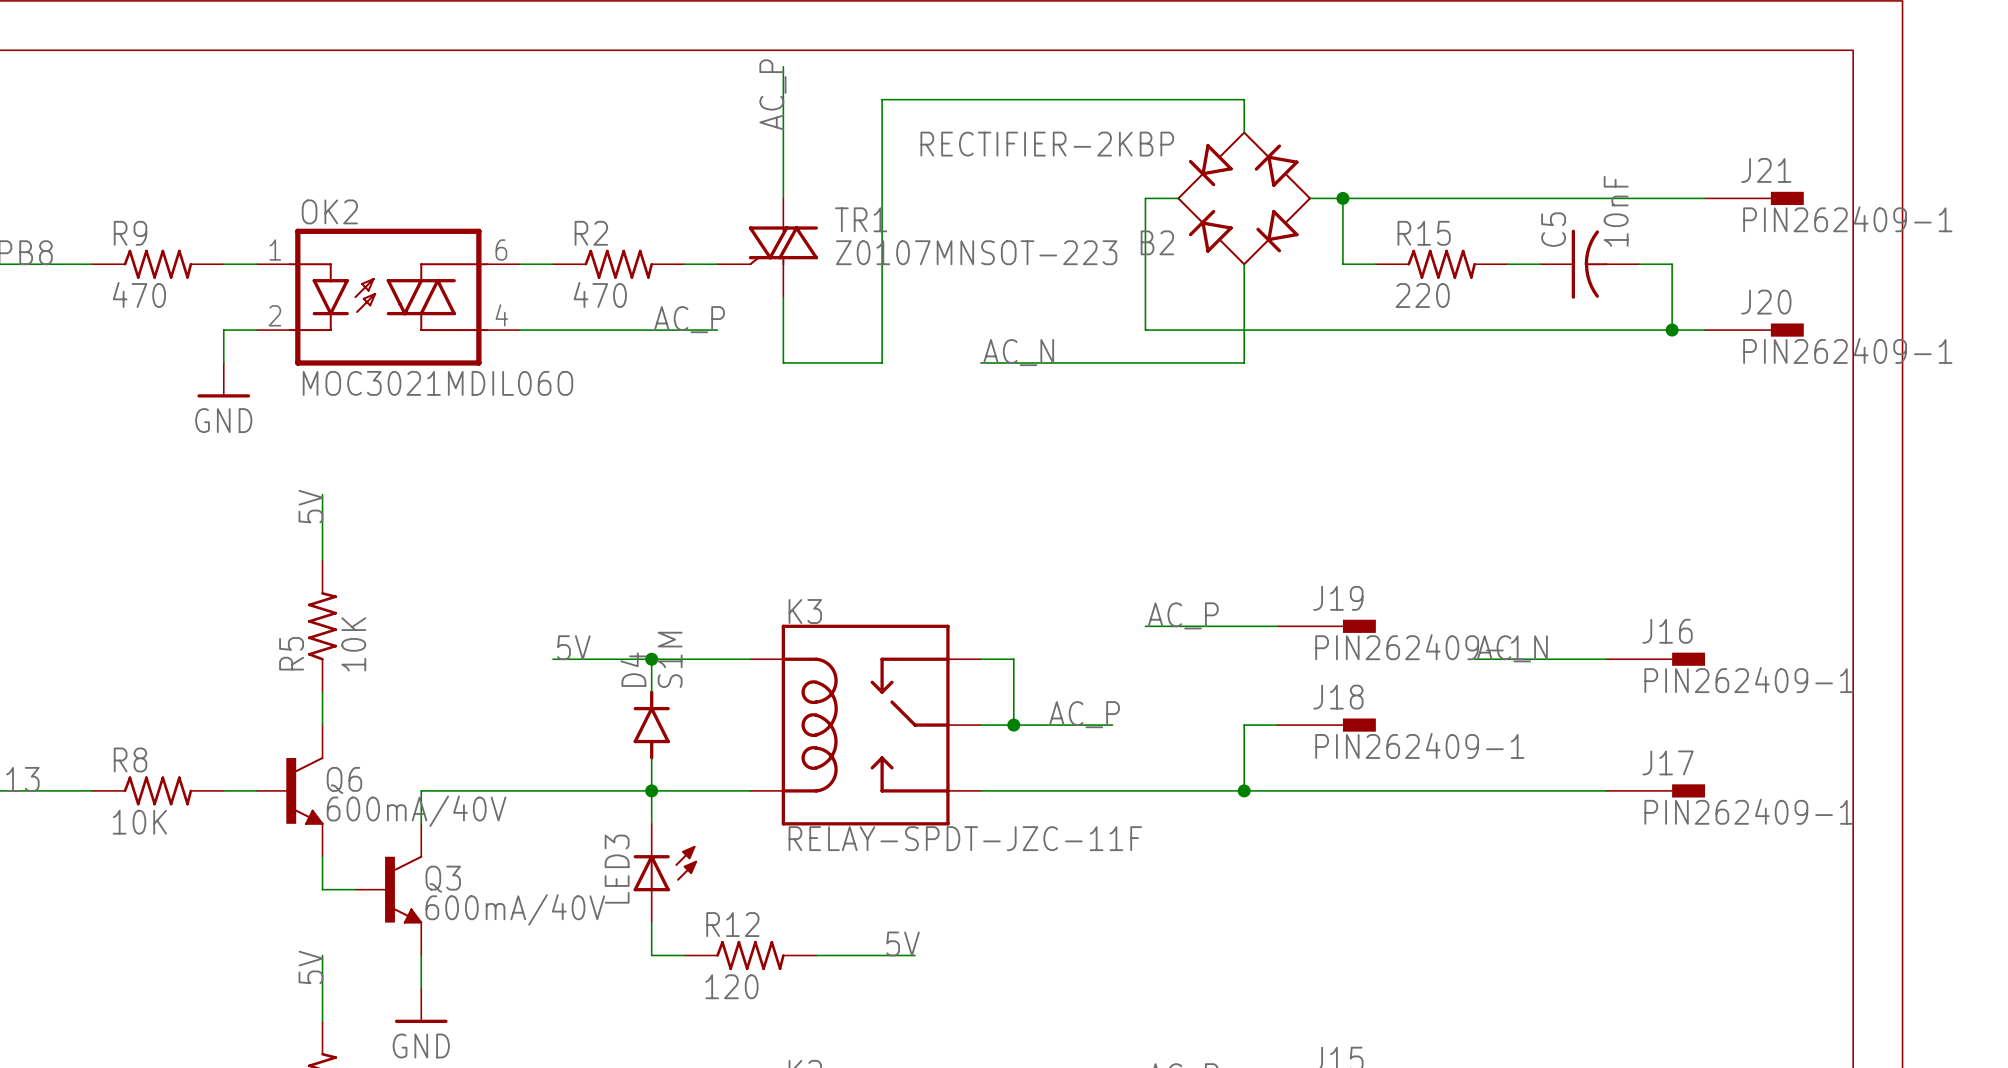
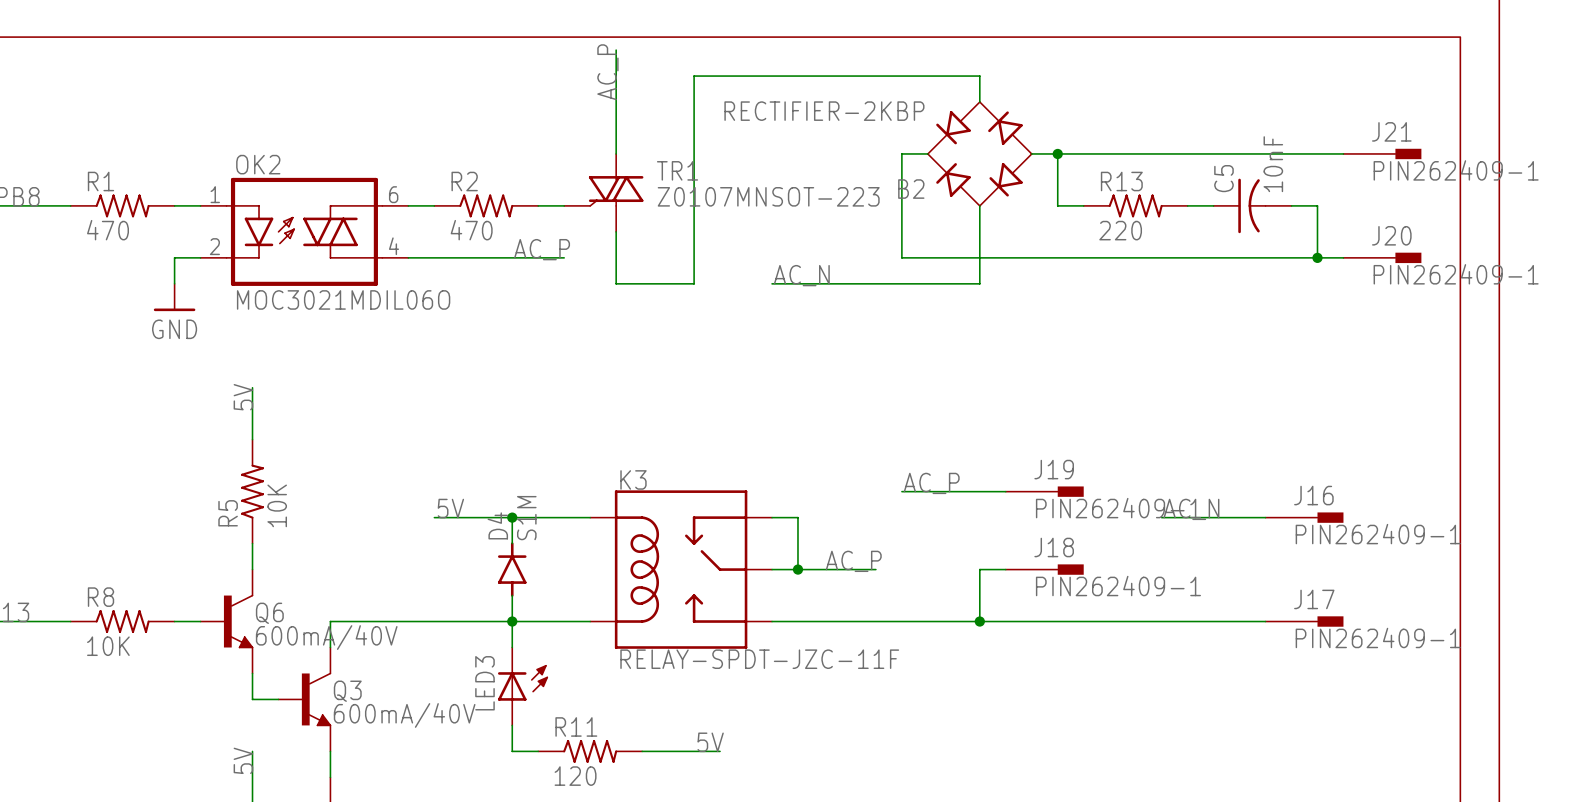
R9 name: R9 (130, 233) -> R1 (100, 181)
R15 name: R15 (1424, 233) -> R13 (1121, 181)
R12 name: R12 (732, 924) -> R11 (576, 726)

